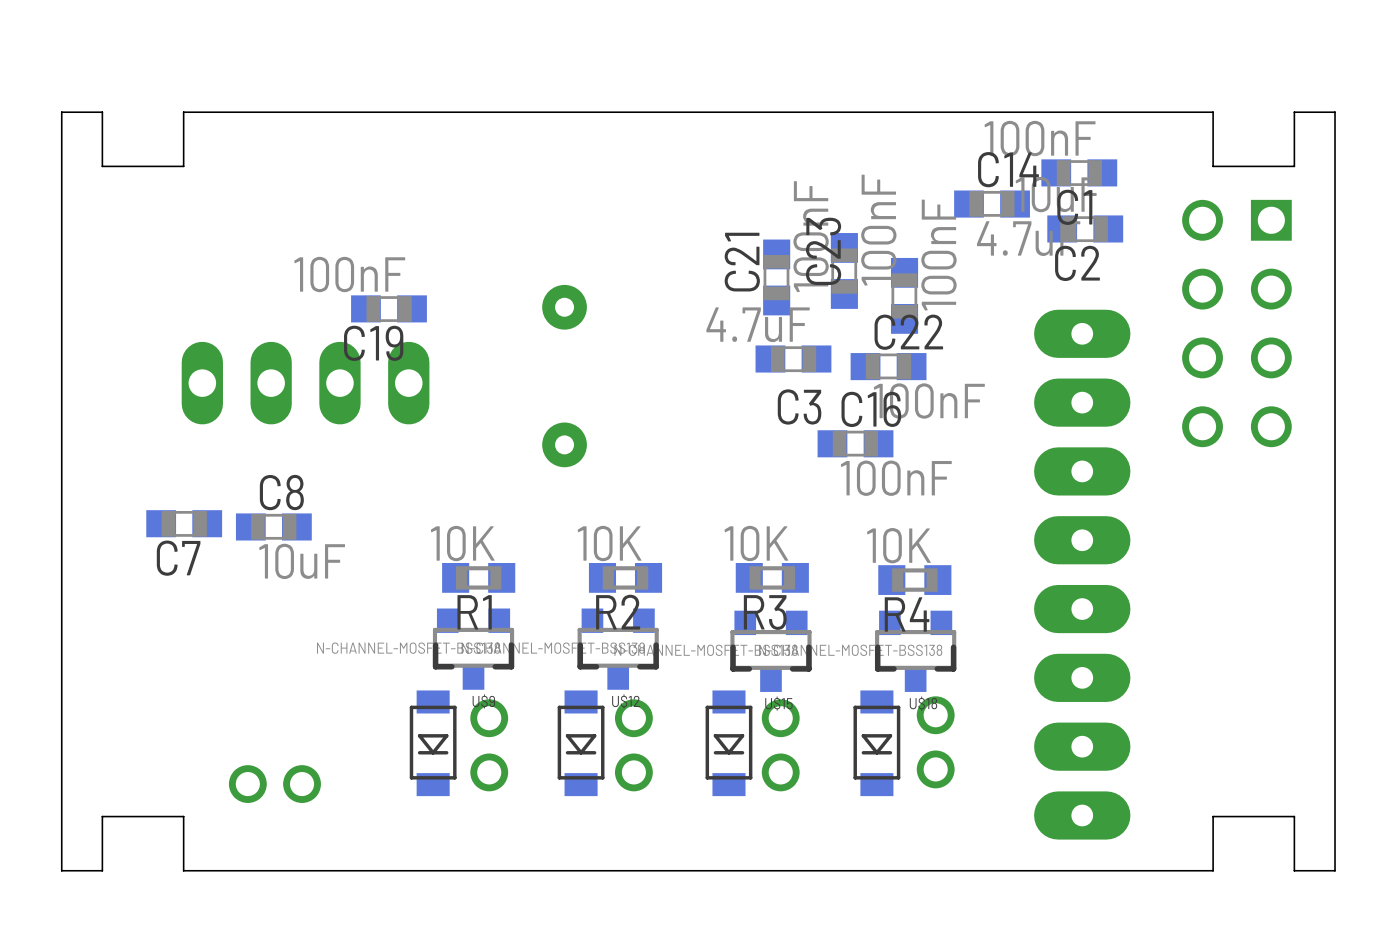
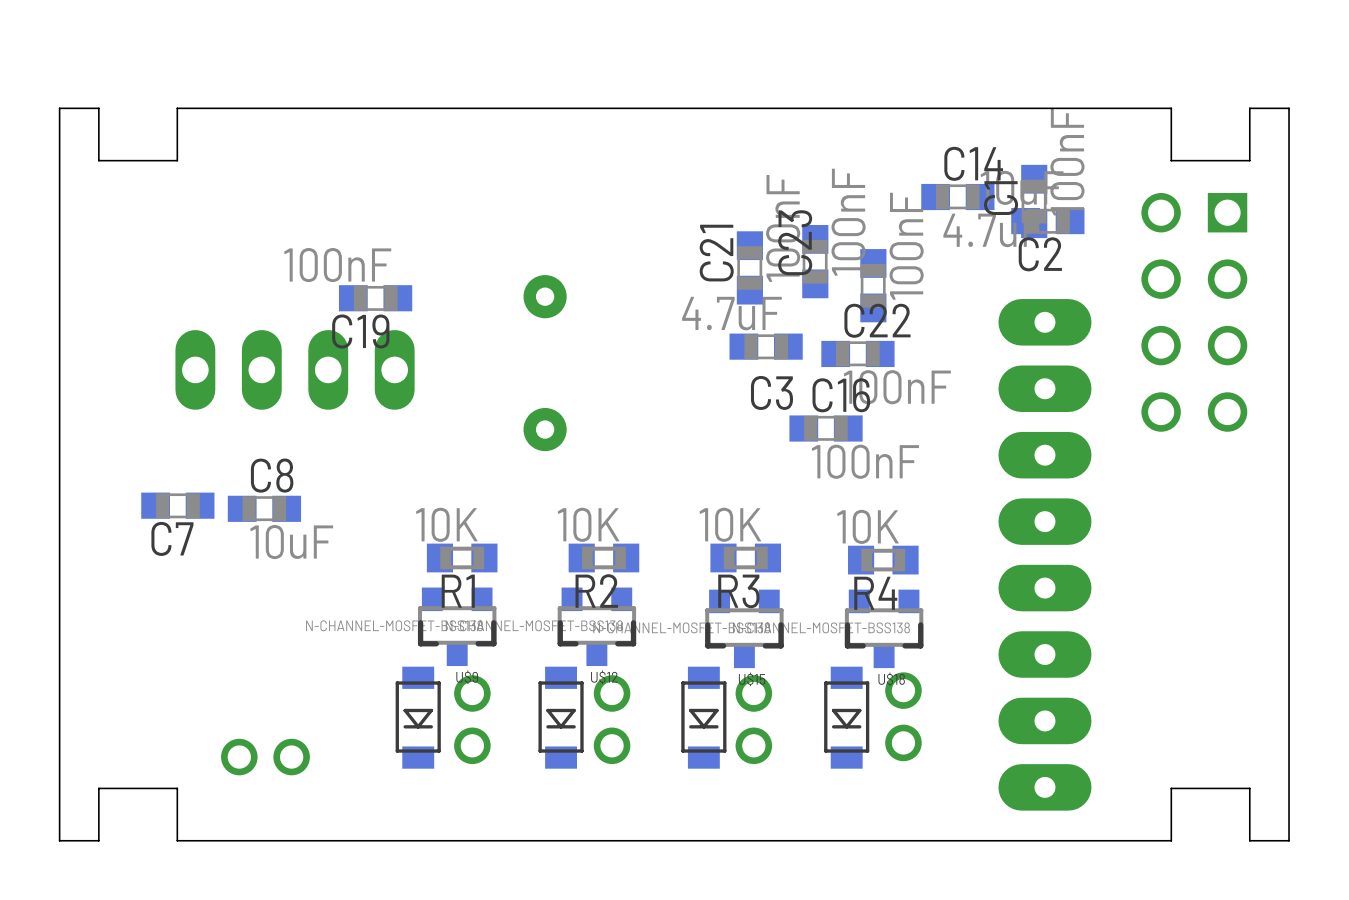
C1 rotation: 0° (1079, 172) -> 90° clockwise (1034, 201)

